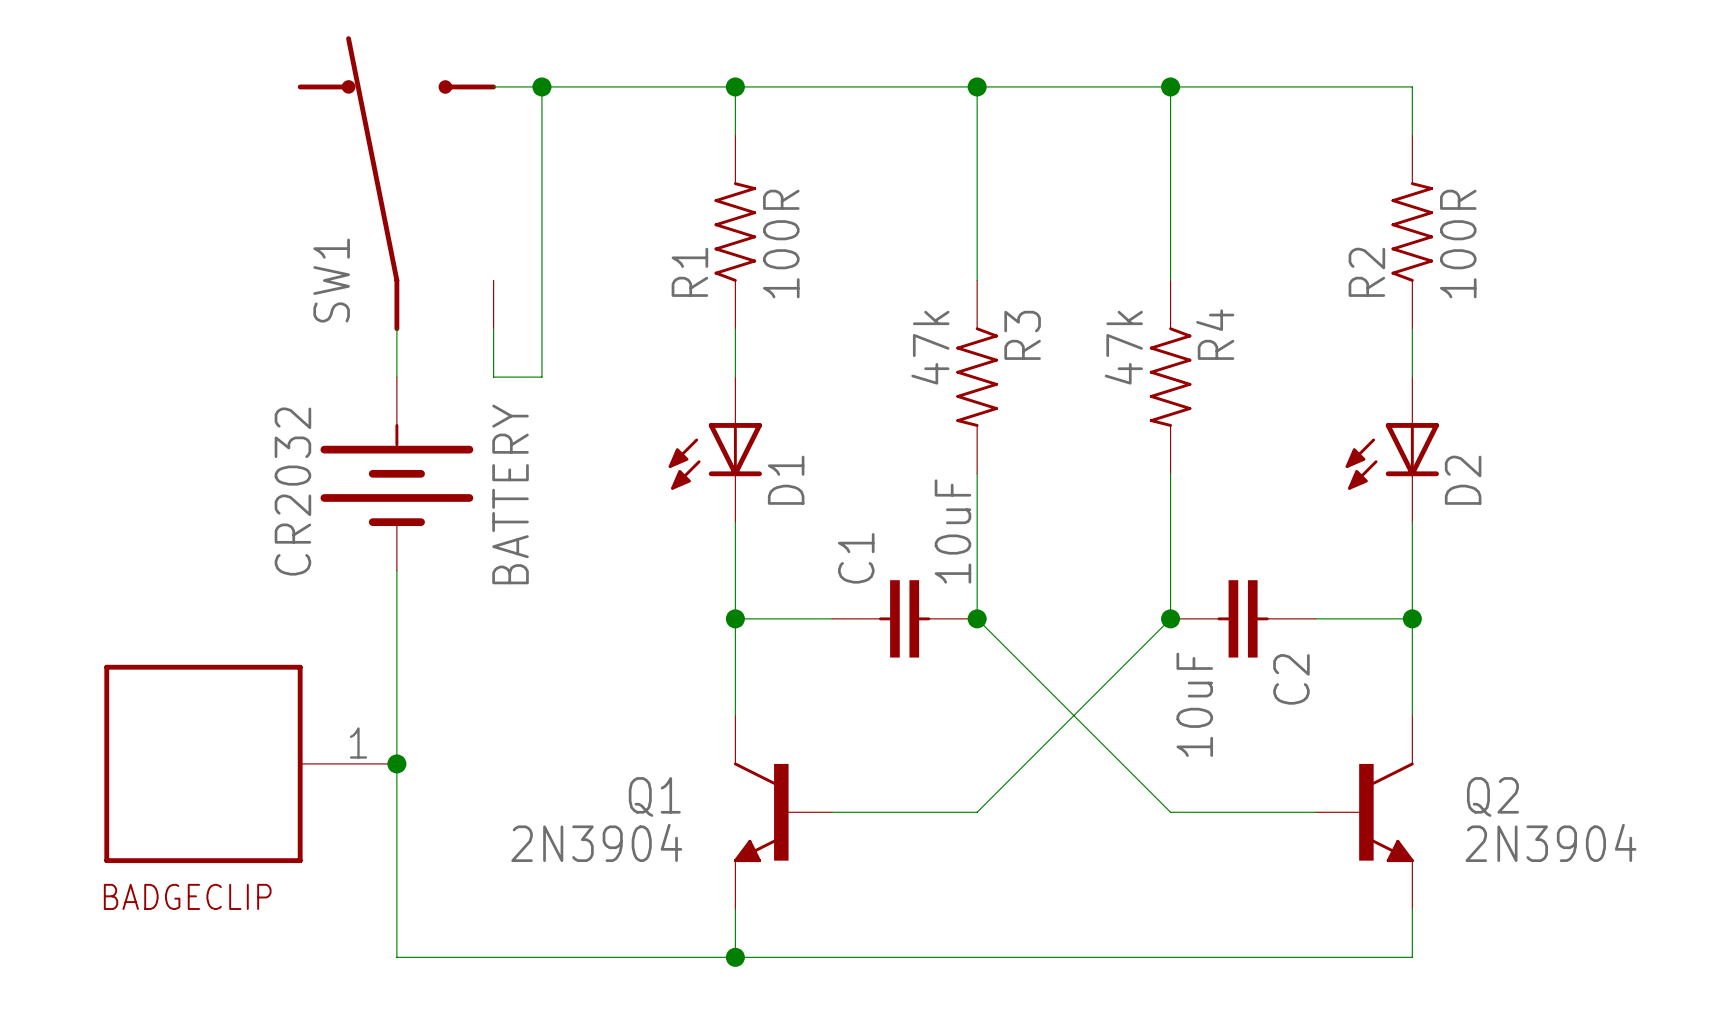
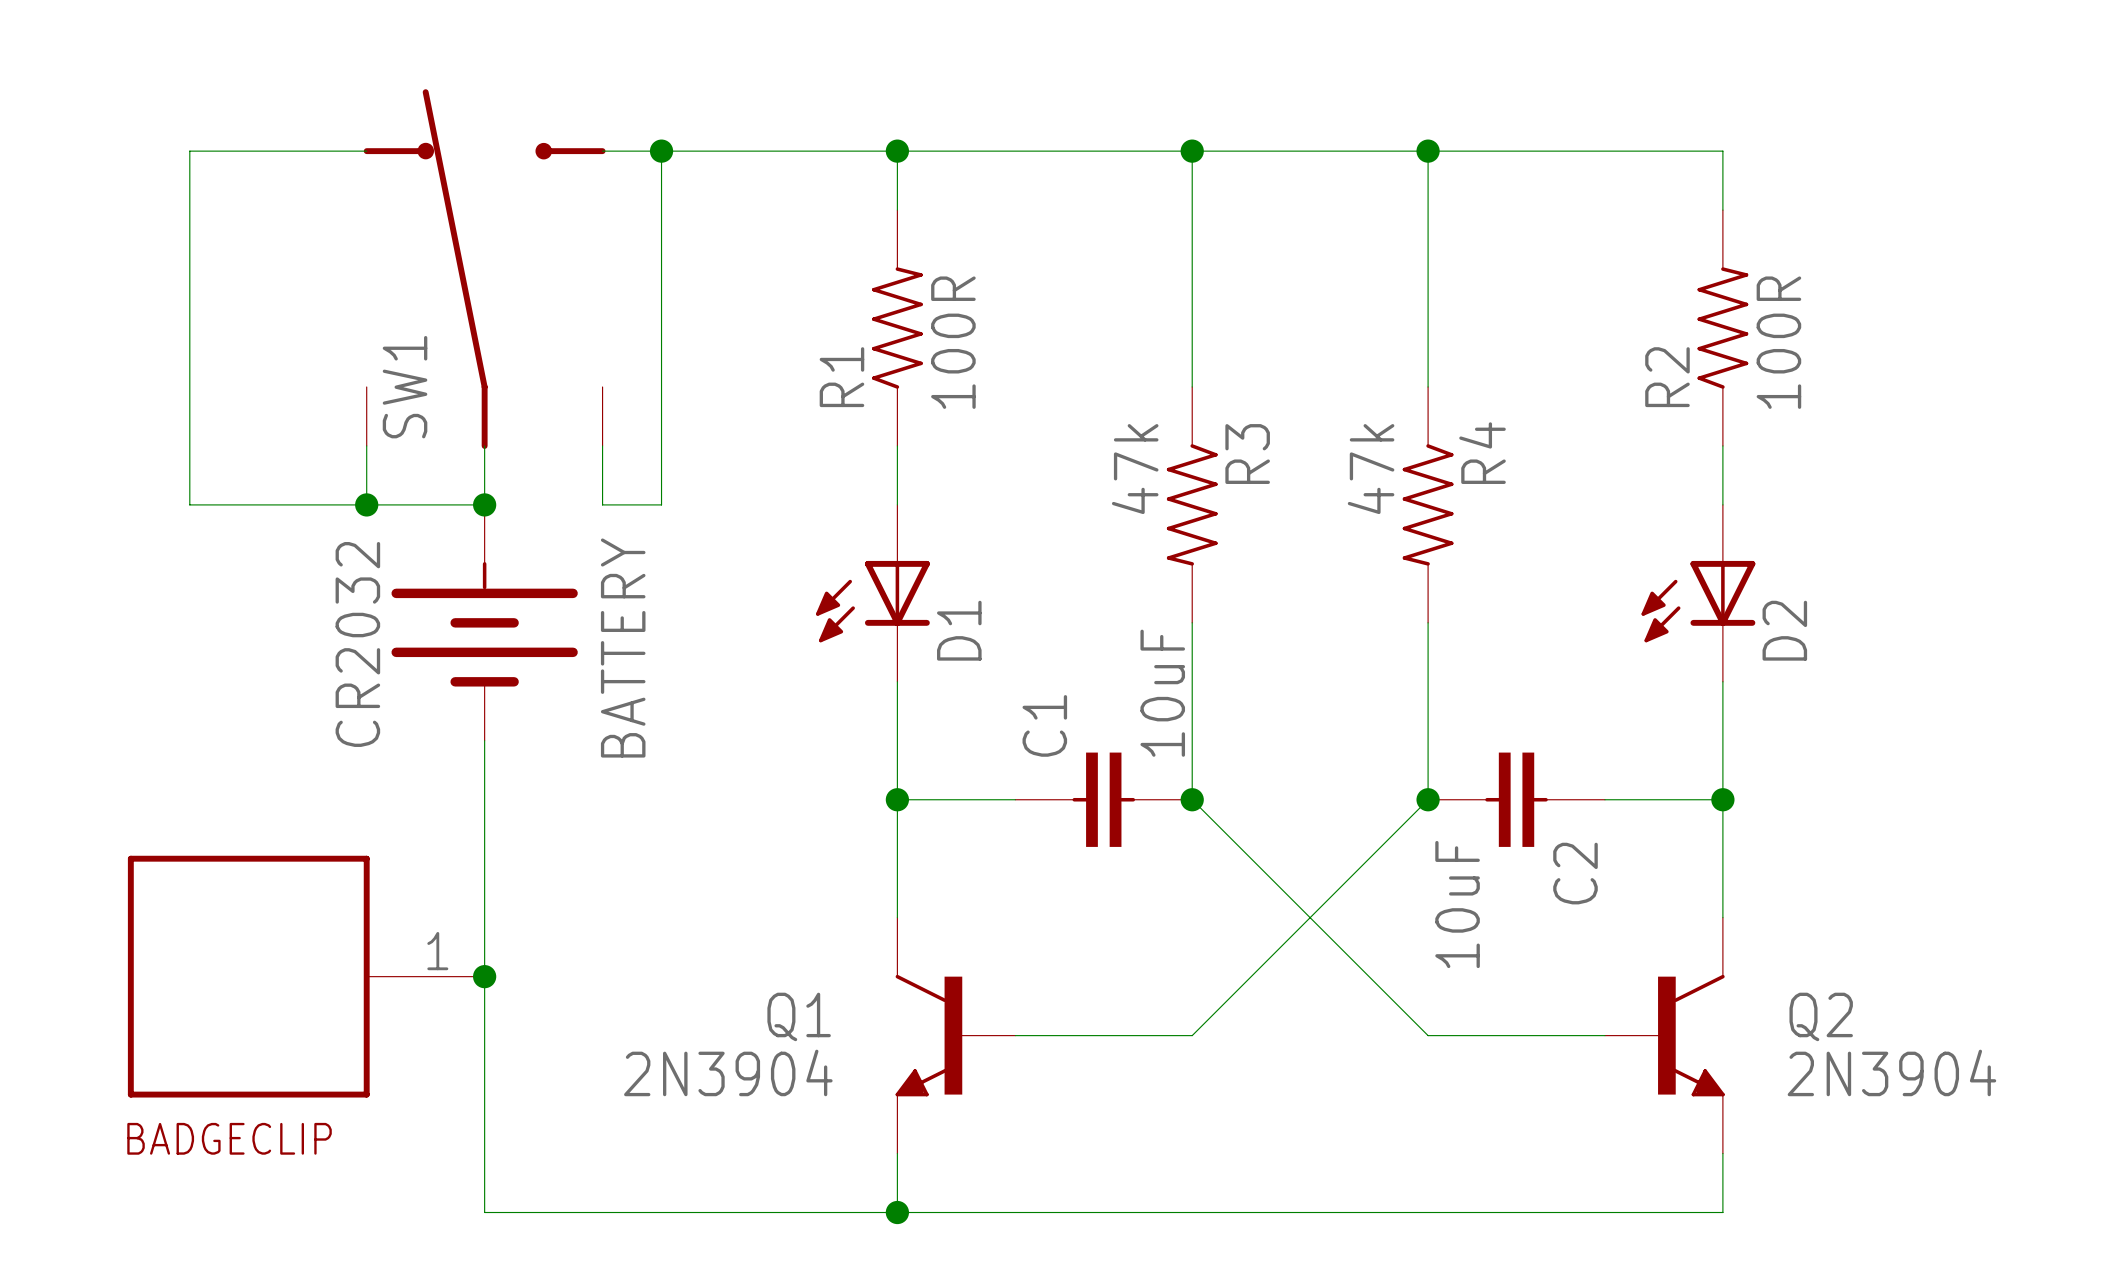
SW1 symbol: [297, 36, 497, 332] -> [363, 89, 606, 449]
wire: none -> (366, 151) (189, 151) (189, 504) (484, 504)
wire: none -> (366, 445) (366, 504)
junction: none -> (366, 504)
junction: none -> (484, 504)

